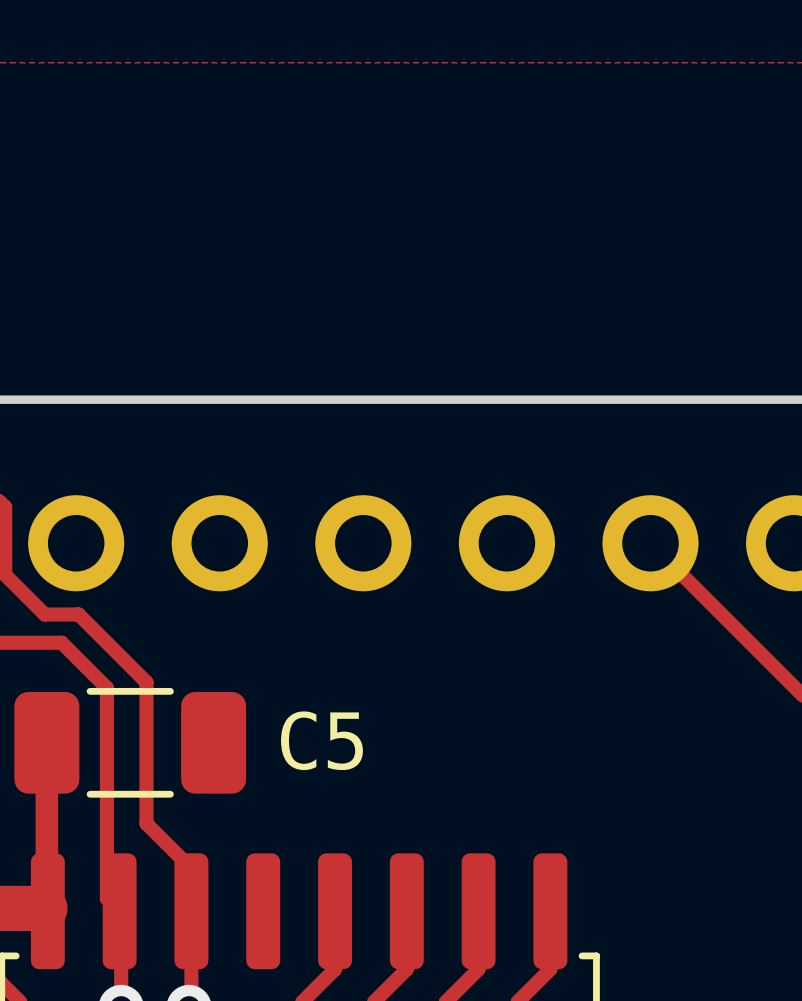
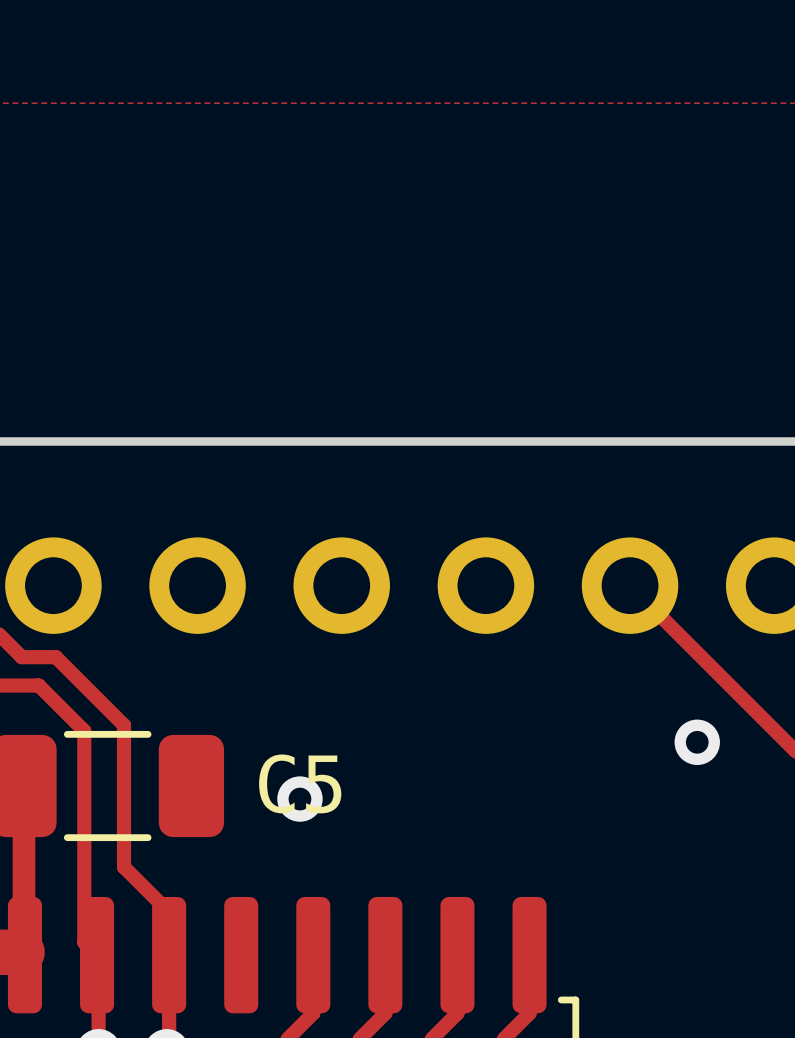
via: none -> (697, 742)
via: none -> (299, 799)

